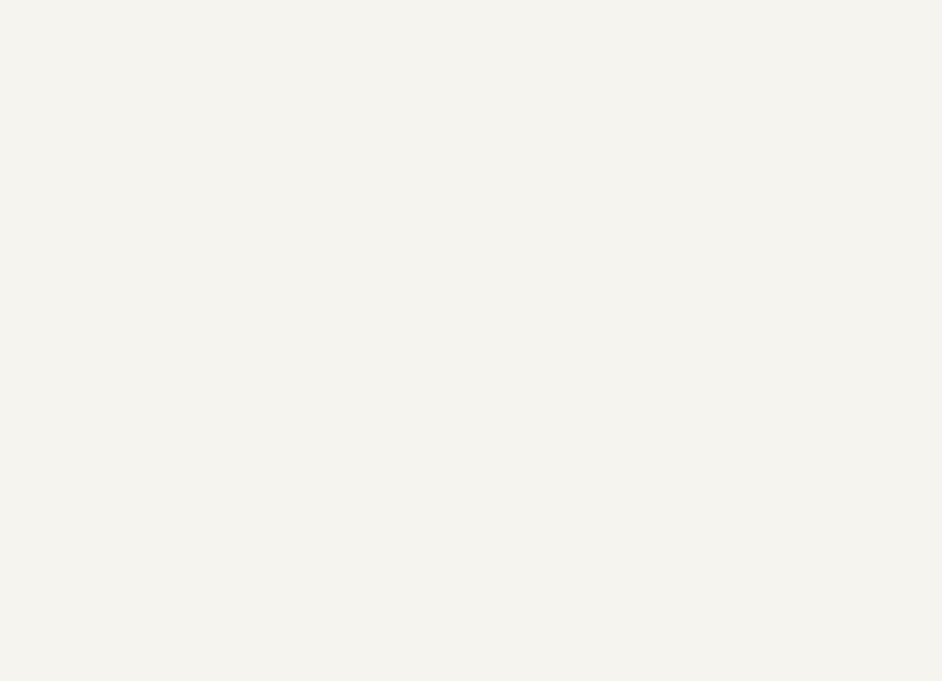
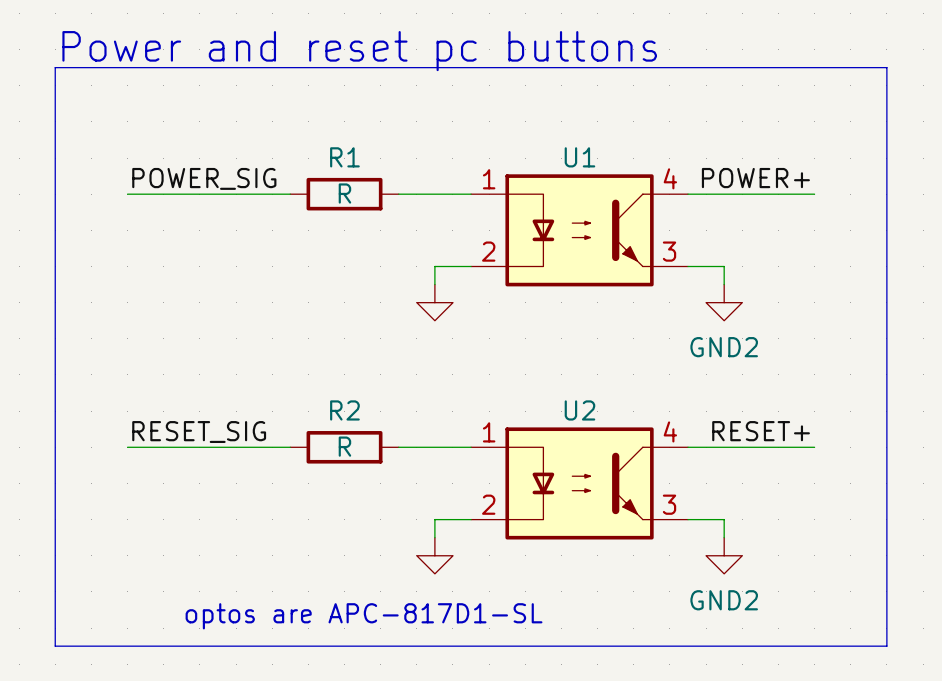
text: none -> Power and reset pc buttons (359, 51)
line: none -> (55, 67) (886, 67) (886, 646) (55, 646) (55, 67)
label: none -> POWER_SIG (204, 178)
label: none -> POWER+ (755, 178)
wire: none -> (127, 194) (290, 194)
R1: none -> R (344, 194)
wire: none -> (398, 194) (471, 194)
wire: none -> (688, 194) (814, 194)
U1: none -> (579, 230)
wire: none -> (471, 266) (434, 266) (434, 284)
wire: none -> (688, 266) (724, 266) (724, 284)
power symbol: none -> (434, 302)
power symbol: none -> GND2 (724, 302)
label: none -> RESET+ (761, 431)
label: none -> RESET_SIG (199, 432)
wire: none -> (127, 447) (290, 447)
R2: none -> R (344, 447)
wire: none -> (398, 447) (471, 447)
wire: none -> (688, 447) (814, 447)
U2: none -> (579, 483)
wire: none -> (471, 519) (434, 519) (434, 537)
wire: none -> (688, 519) (724, 519) (724, 537)
power symbol: none -> (434, 555)
power symbol: none -> GND2 (724, 555)
text: none -> optos are APC-817D1-SL (364, 616)

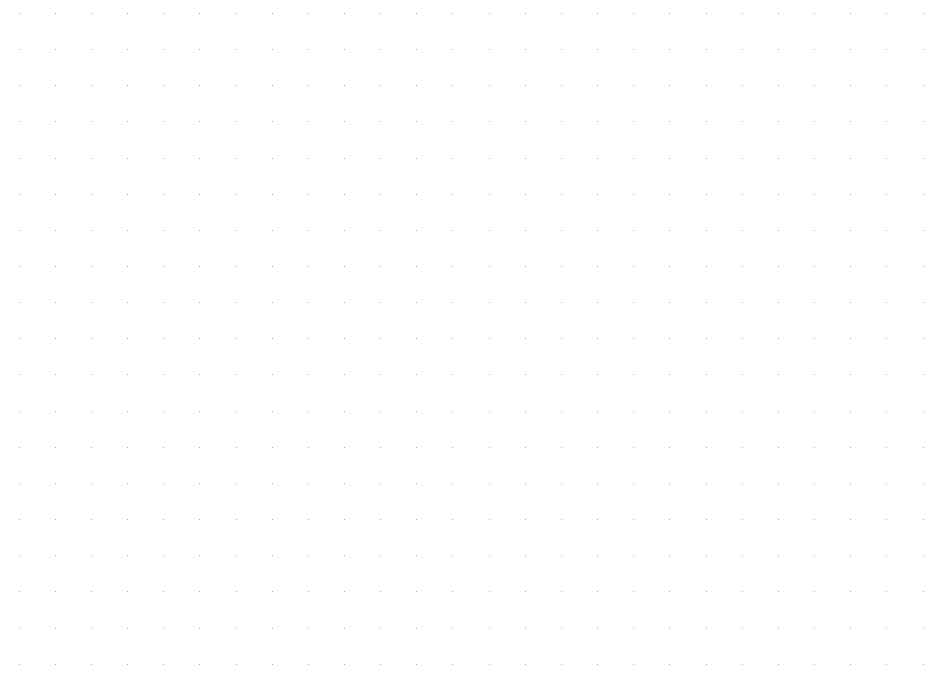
text: Power and reset pc buttons (359, 51) -> none
line: (55, 67) (886, 67) (886, 646) (55, 646) (55, 67) -> none
label: POWER_SIG (204, 178) -> none
label: POWER+ (755, 178) -> none
wire: (127, 194) (290, 194) -> none
R1: R (344, 194) -> none
wire: (398, 194) (471, 194) -> none
wire: (688, 194) (814, 194) -> none
U1: (579, 230) -> none
wire: (471, 266) (434, 266) (434, 284) -> none
wire: (688, 266) (724, 266) (724, 284) -> none
power symbol: (434, 302) -> none
power symbol: GND2 (724, 302) -> none
label: RESET+ (761, 431) -> none
label: RESET_SIG (199, 432) -> none
wire: (127, 447) (290, 447) -> none
R2: R (344, 447) -> none
wire: (398, 447) (471, 447) -> none
wire: (688, 447) (814, 447) -> none
U2: (579, 483) -> none
wire: (471, 519) (434, 519) (434, 537) -> none
wire: (688, 519) (724, 519) (724, 537) -> none
power symbol: (434, 555) -> none
power symbol: GND2 (724, 555) -> none
text: optos are APC-817D1-SL (364, 616) -> none

